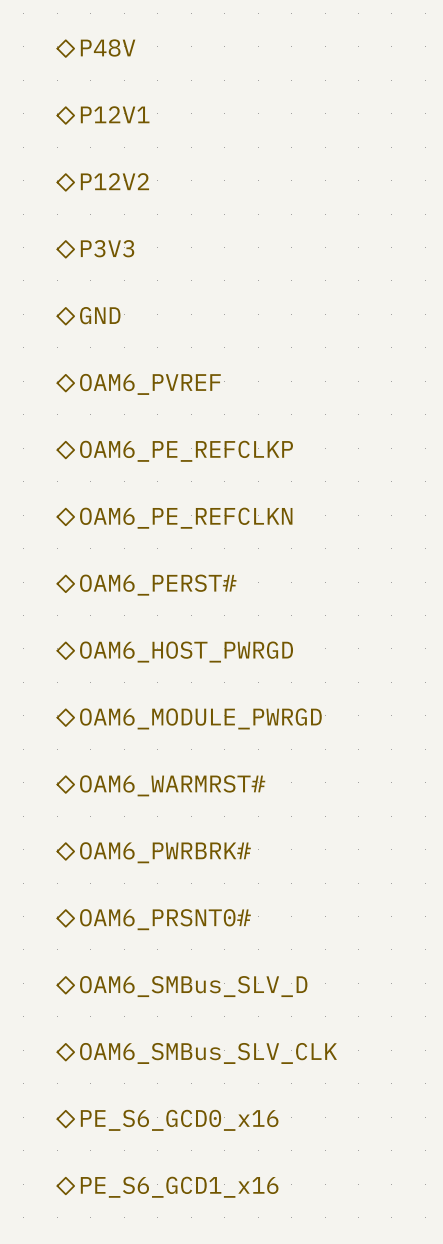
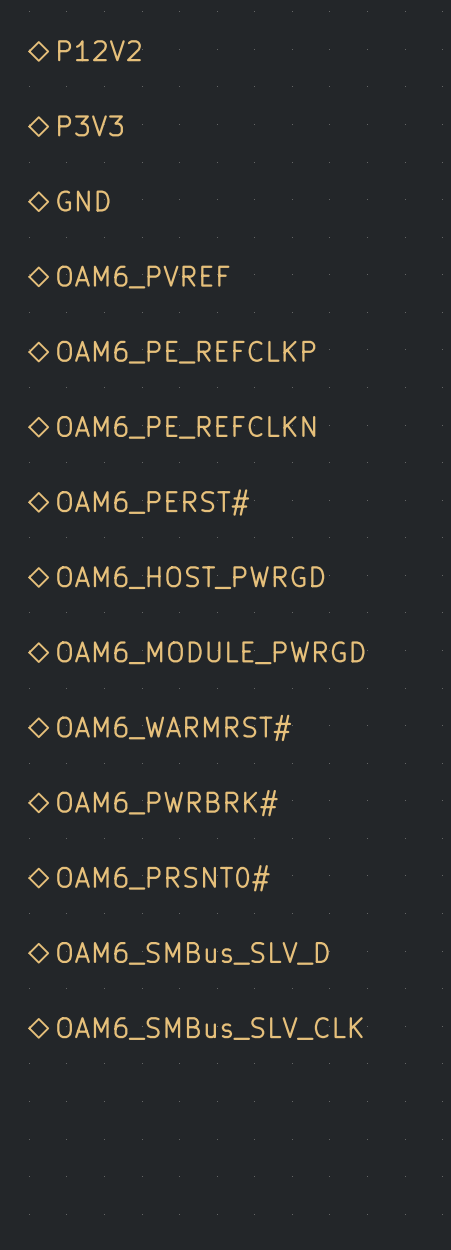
hierarchical label: PE_S6_GCD0_x16 (179, 1120) -> none
hierarchical label: PE_S6_GCD1_x16 (179, 1187) -> none

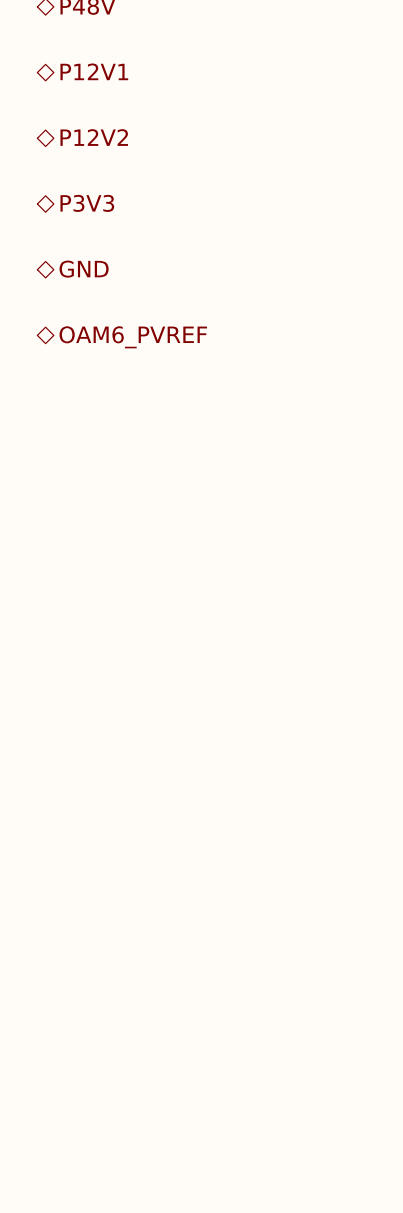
hierarchical label: OAM6_PE_REFCLKP (186, 352) -> none
hierarchical label: OAM6_PE_REFCLKN (186, 427) -> none
hierarchical label: OAM6_PERST# (153, 502) -> none
hierarchical label: OAM6_HOST_PWRGD (190, 577) -> none
hierarchical label: OAM6_MODULE_PWRGD (210, 652) -> none
hierarchical label: OAM6_WARMRST# (174, 727) -> none
hierarchical label: OAM6_PWRBRK# (167, 803) -> none
hierarchical label: OAM6_PRSNT0# (163, 878) -> none
hierarchical label: OAM6_SMBus_SLV_D (192, 953) -> none
hierarchical label: OAM6_SMBus_SLV_CLK (209, 1028) -> none

